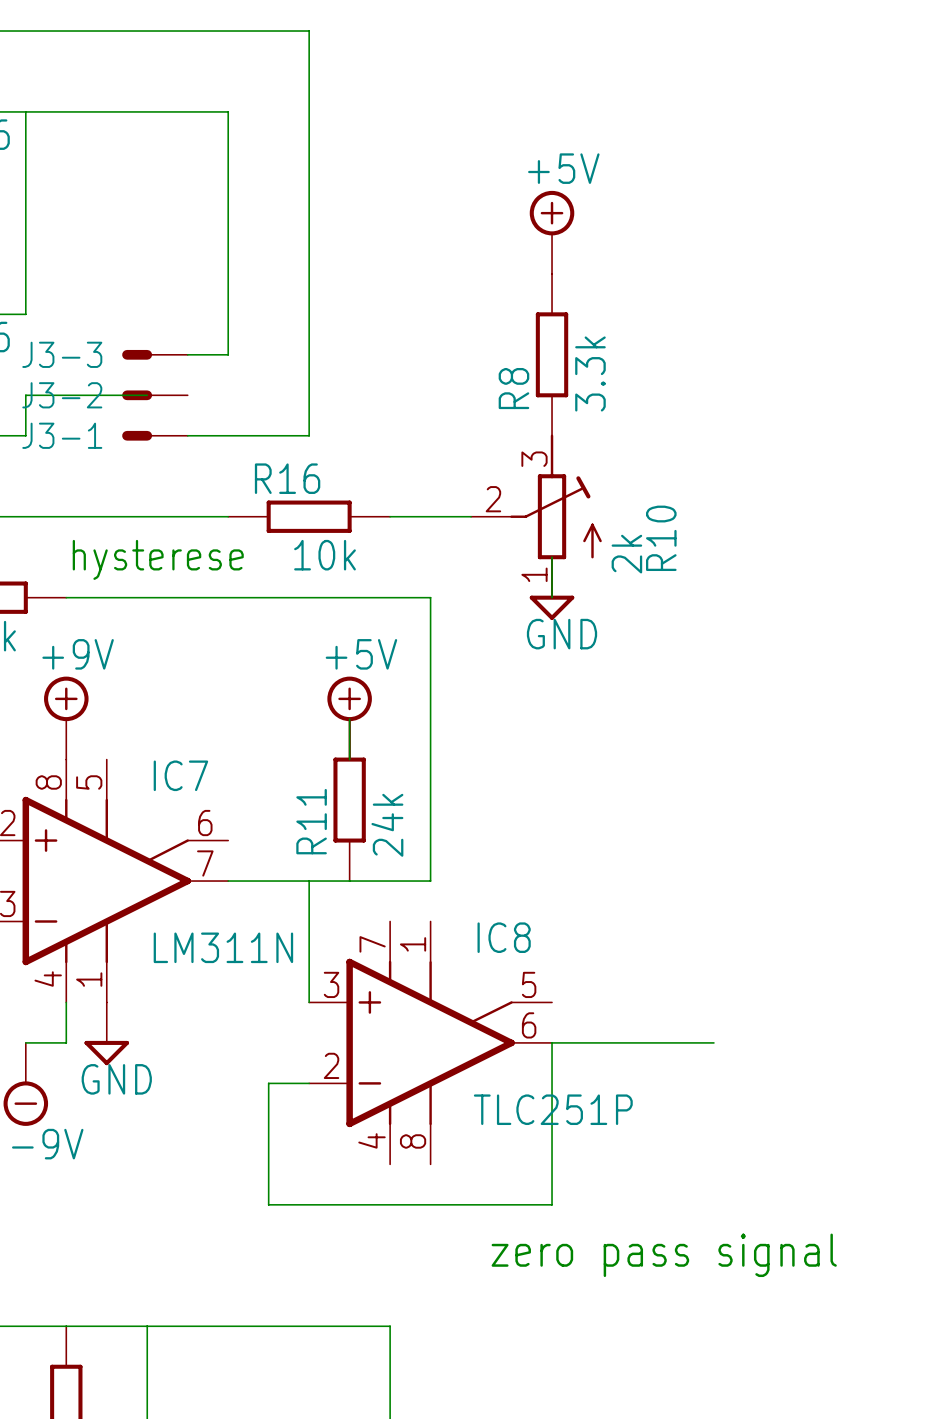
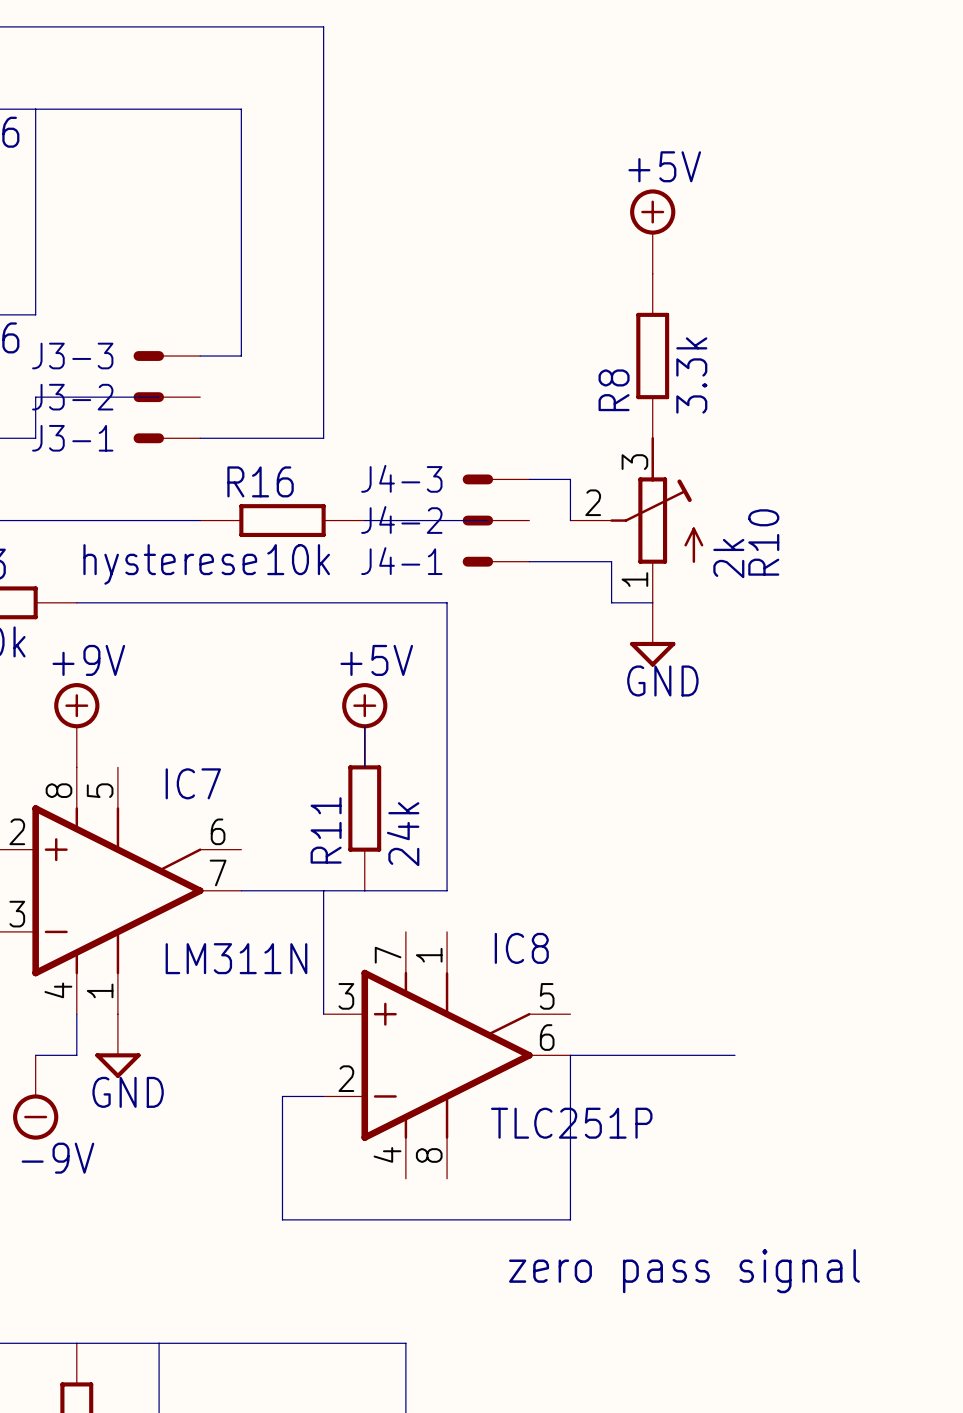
power symbol position: +5V (552, 232) -> +5V (652, 231)
R8 position: (552, 354) -> (652, 356)
J4-3: none -> (495, 479)
wire: none -> (529, 479) (570, 479) (570, 520)
R16 position: (309, 516) -> (282, 520)
J4-2: none -> (495, 520)
R10 position: (536, 516) -> (636, 519)
J4-1: none -> (495, 561)
wire: none -> (529, 561) (611, 561) (611, 602) (652, 602)
wire: (552, 557) (552, 597) -> none
power symbol position: GND (552, 588) -> GND (652, 634)

